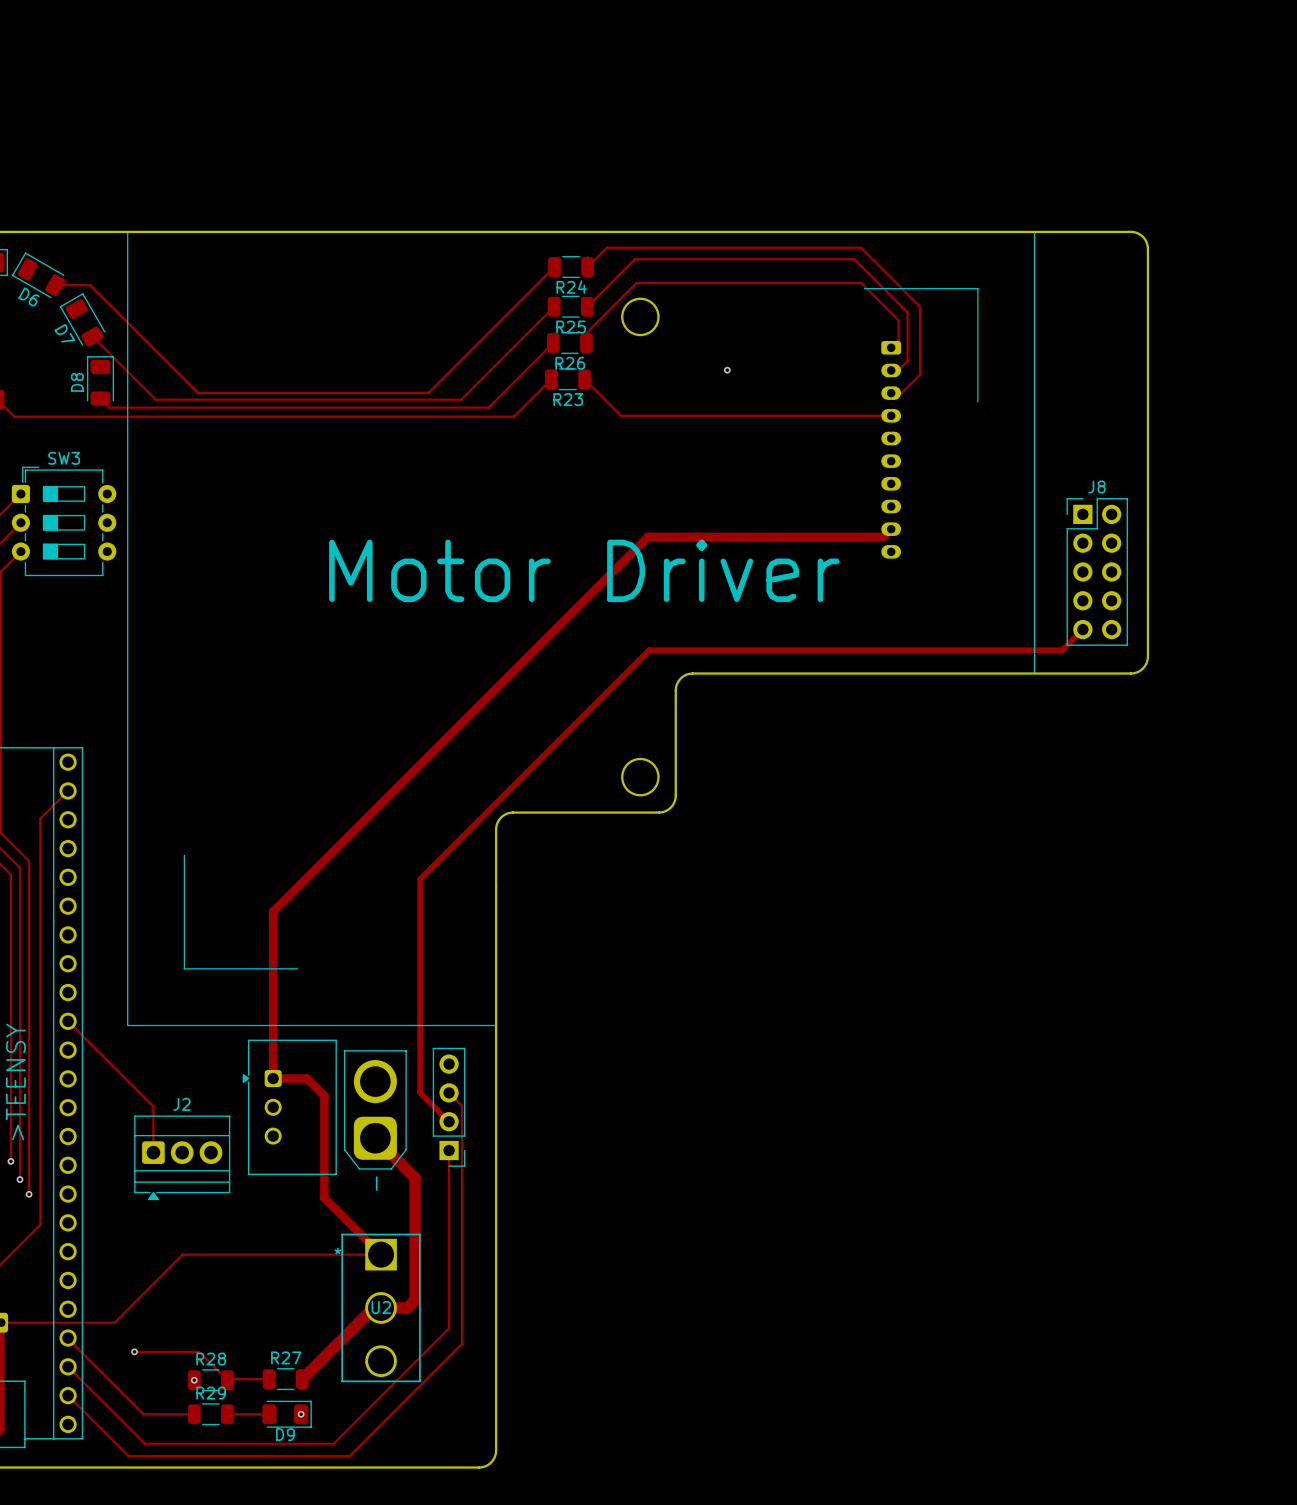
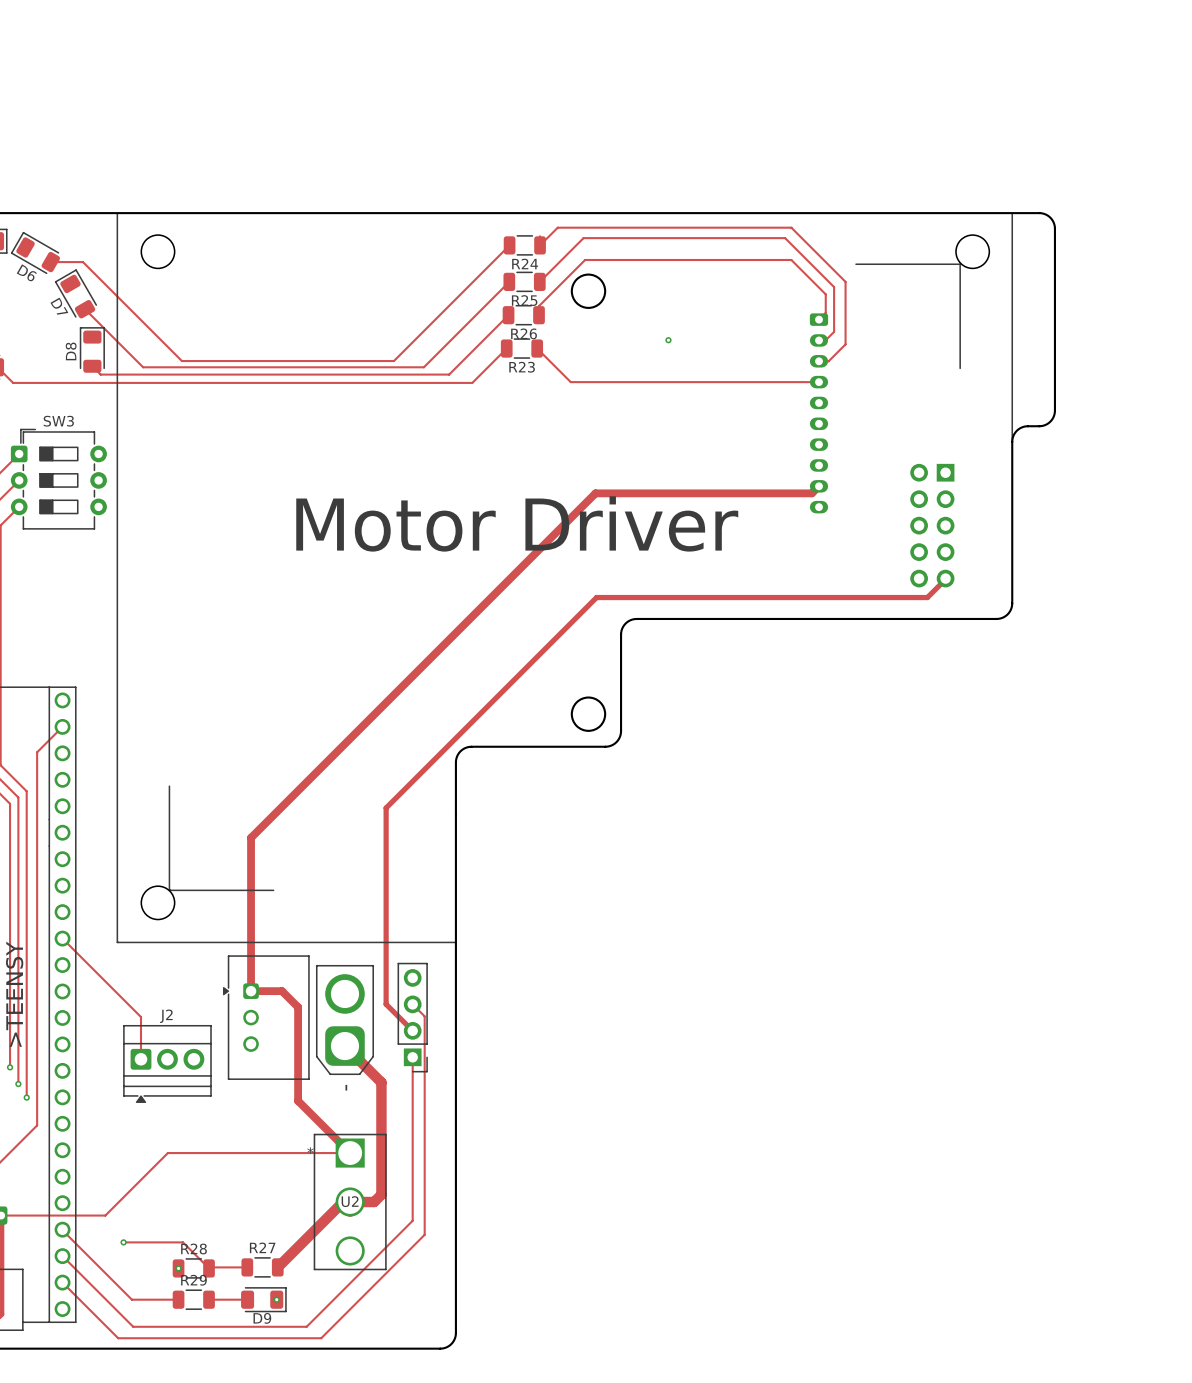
line: (1034, 231) (1034, 672) -> none
line: none -> (1012, 213) (1012, 441)
round board edge: none -> [141, 234, 175, 269]
round board edge: none -> [955, 234, 990, 269]
line: (864, 288) (977, 288) (977, 402) -> (855, 264) (960, 264) (960, 368)
board edge: (1147, 446) (1147, 660) (1142, 668) (1134, 673) (1084, 673) -> (1054, 410) (1052, 418) (1047, 424) (1021, 427) (1015, 432) (1012, 437) (1012, 605) (1006, 615) (996, 618)
J8 side: top (1097, 571) -> bottom (932, 525)
track: (1082, 629) (1062, 650) (1009, 650) -> (946, 578) (927, 597)
round board edge: none -> [141, 885, 175, 920]

